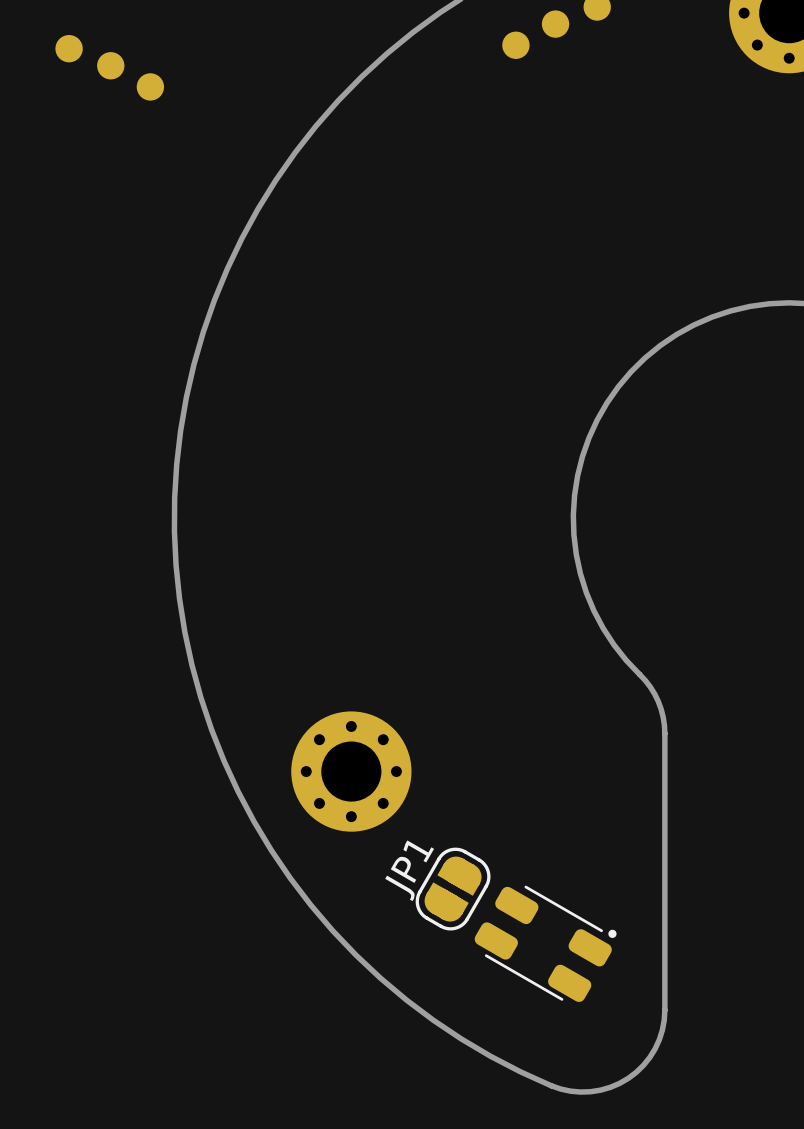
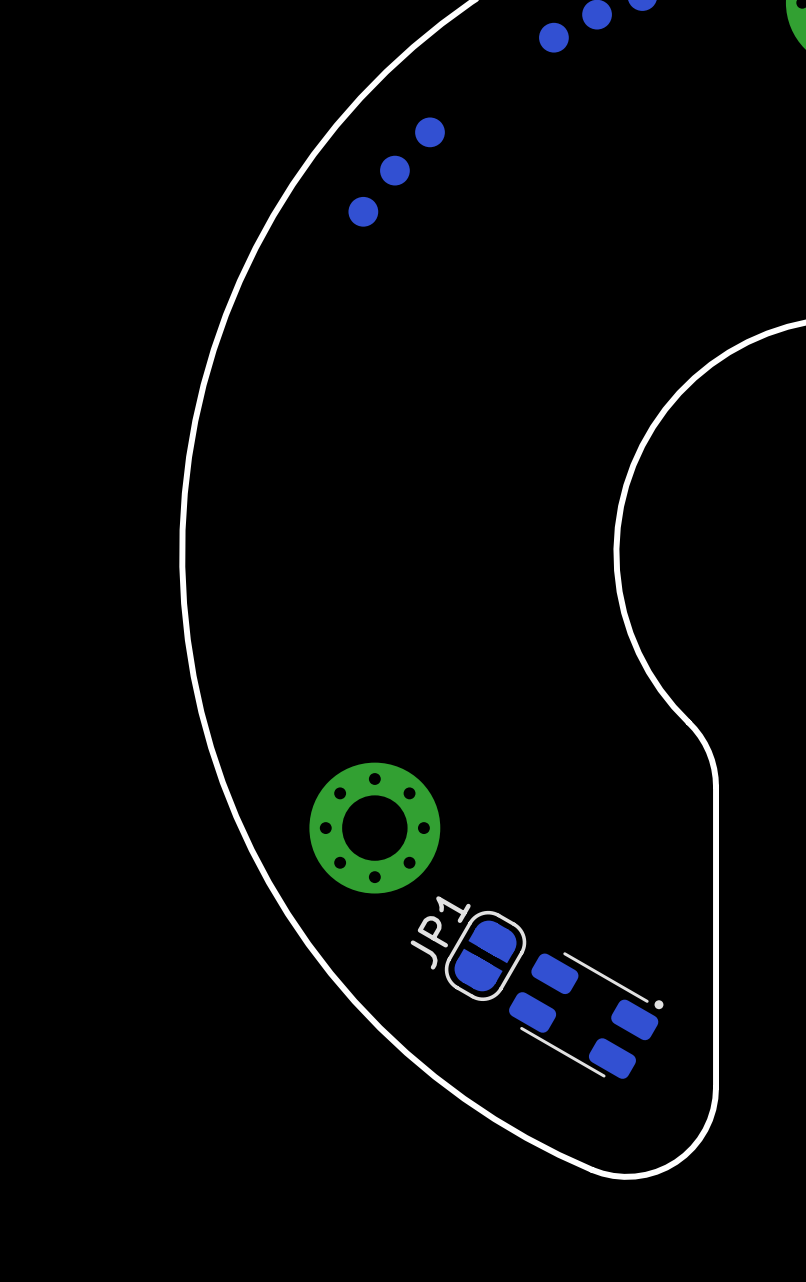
part: (69, 48) -> none
part: (110, 65) -> none
part: (150, 86) -> none
part: none -> (430, 132)
part: none -> (394, 170)
part: none -> (363, 211)

